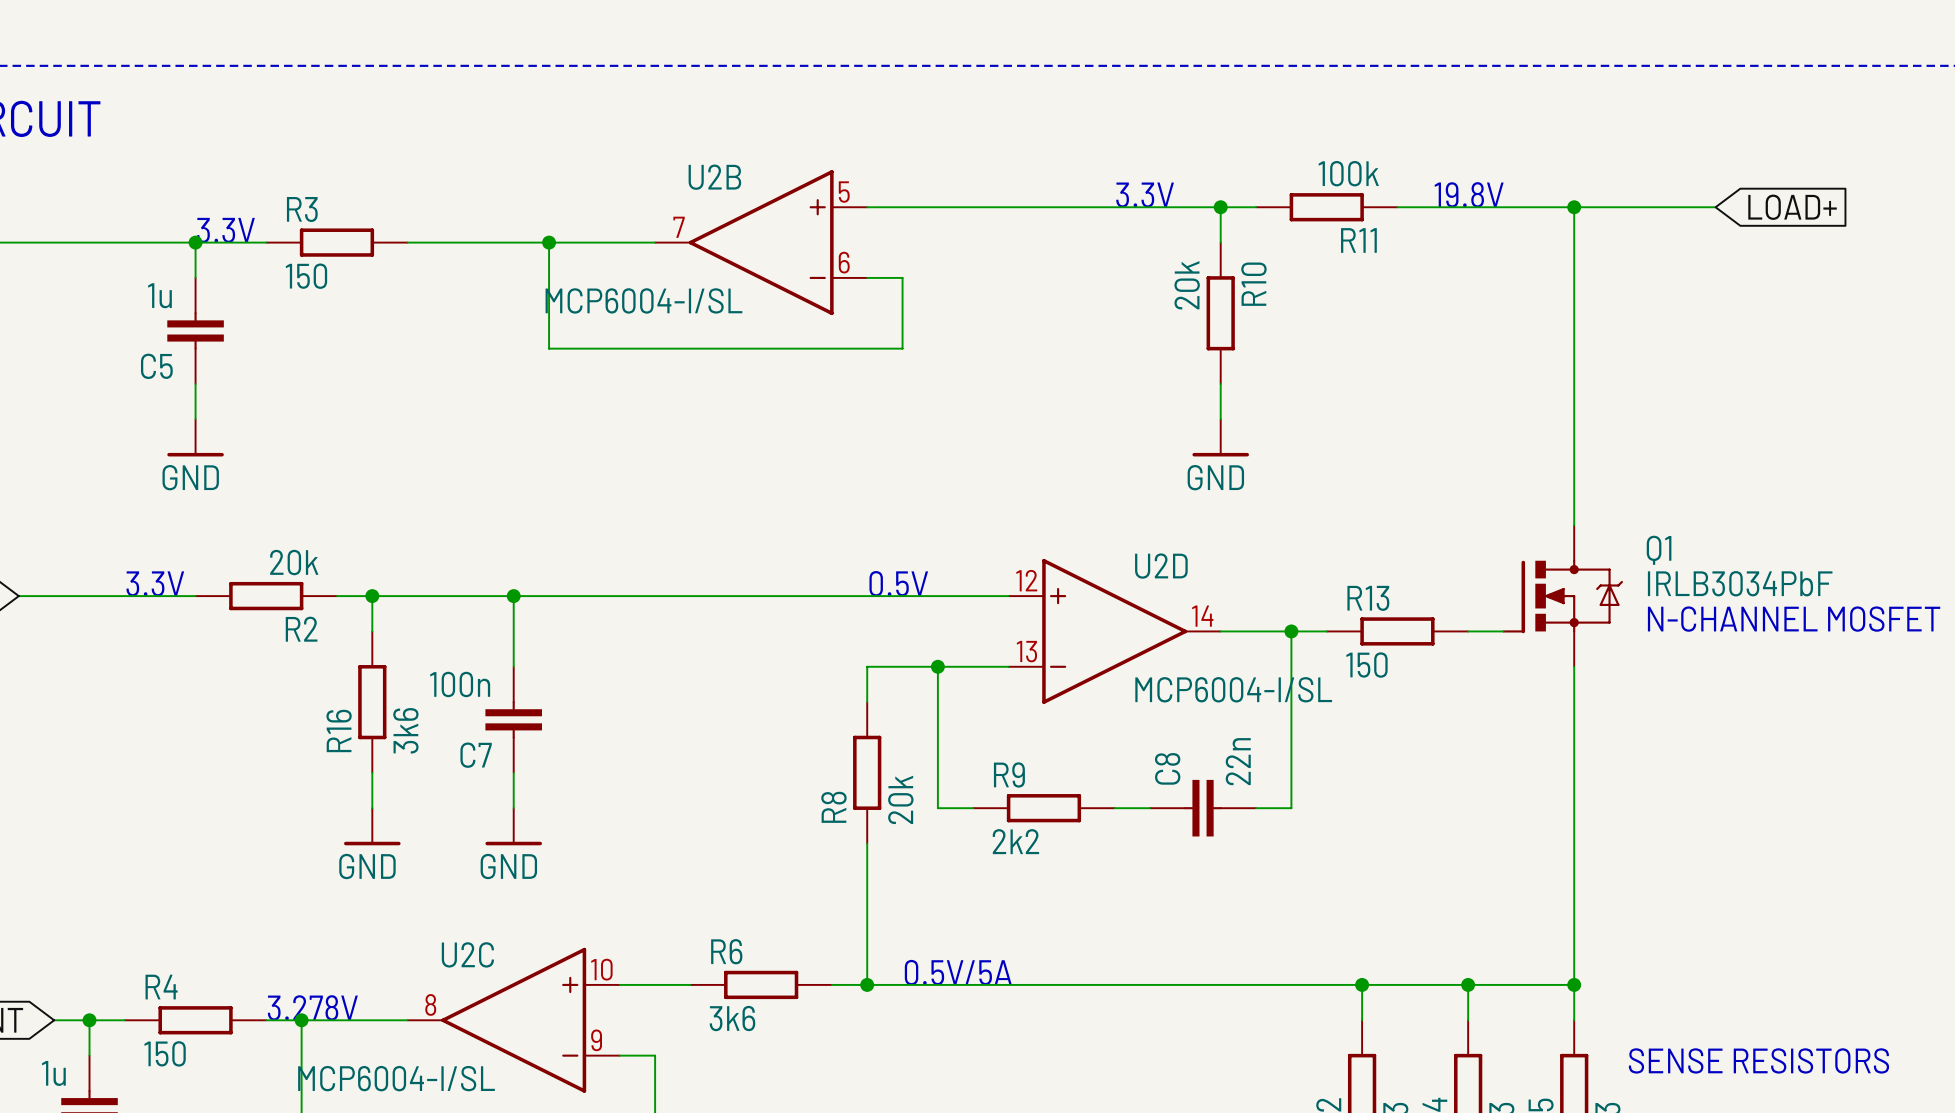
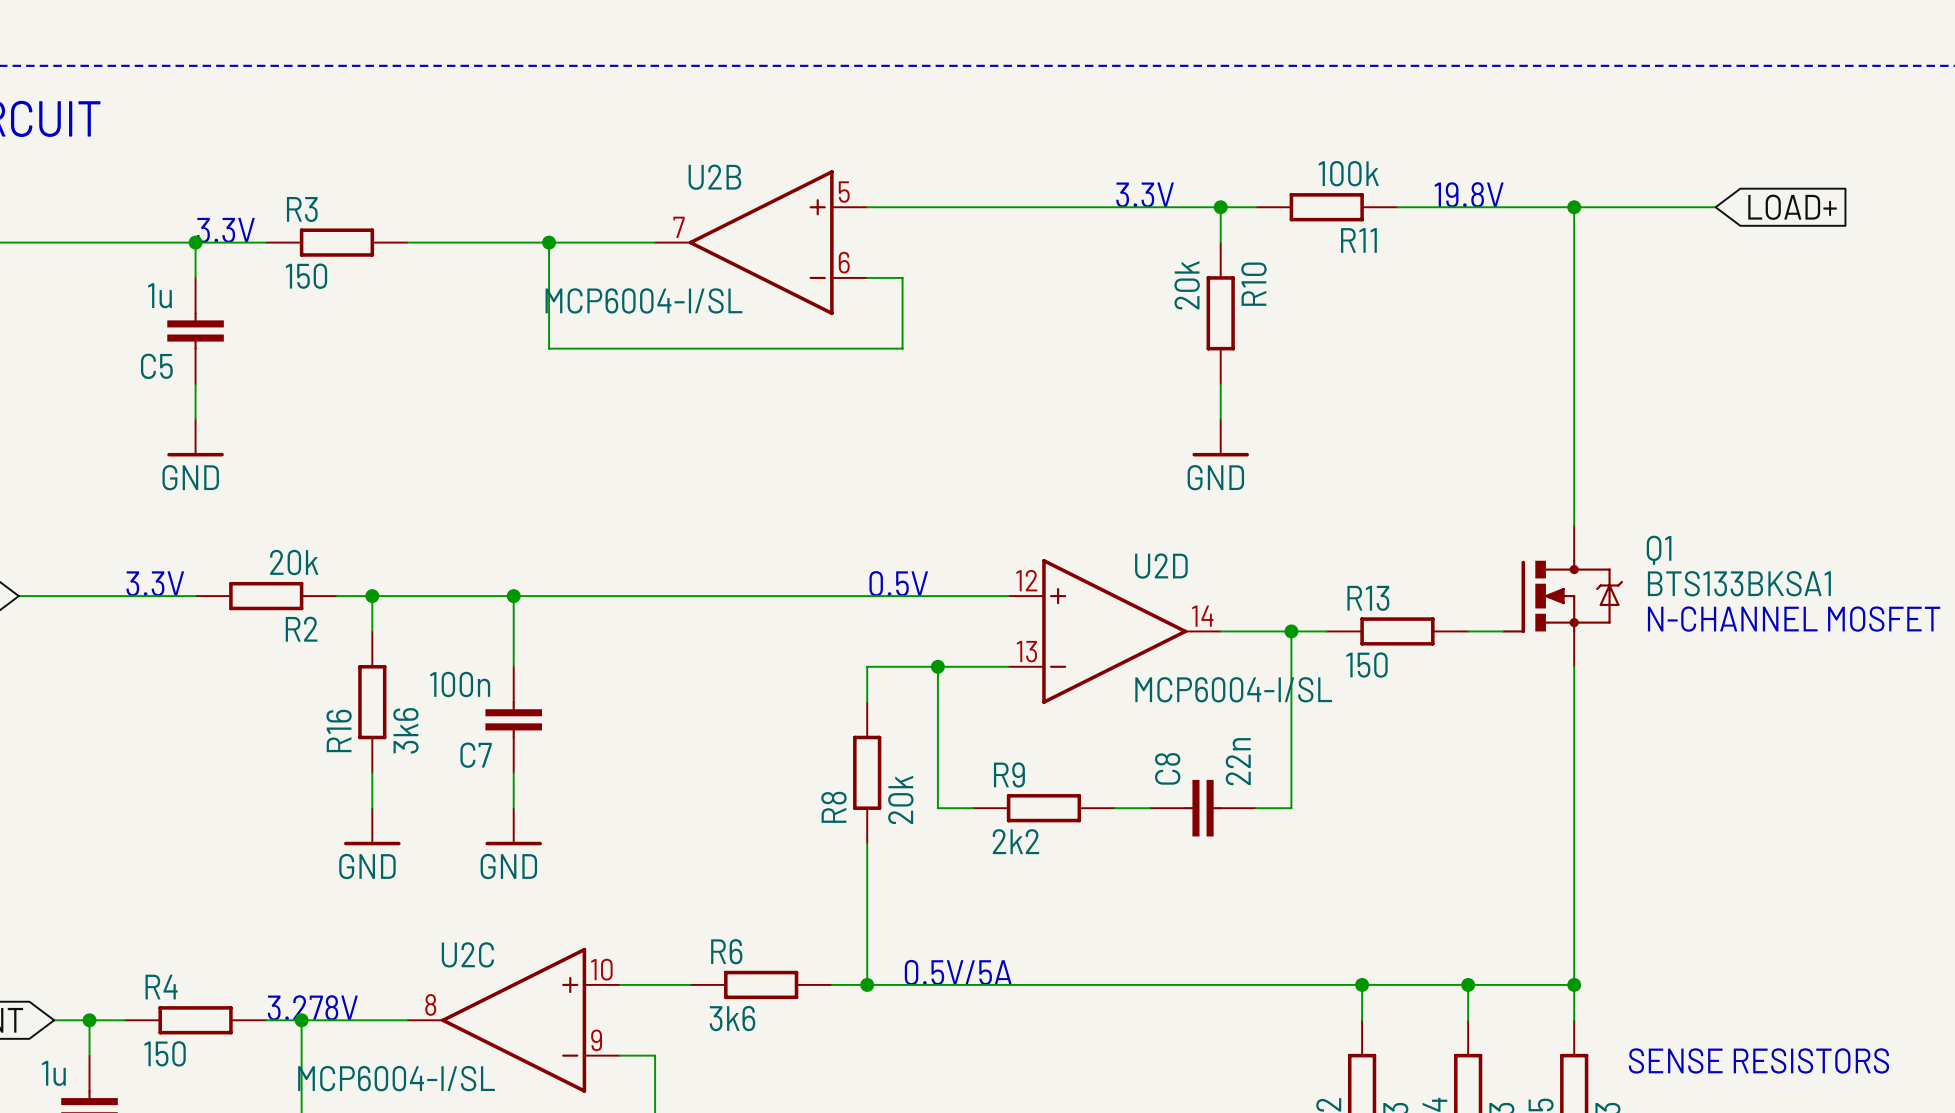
Q1 value: IRLB3034PbF (1740, 583) -> BTS133BKSA1 (1739, 583)

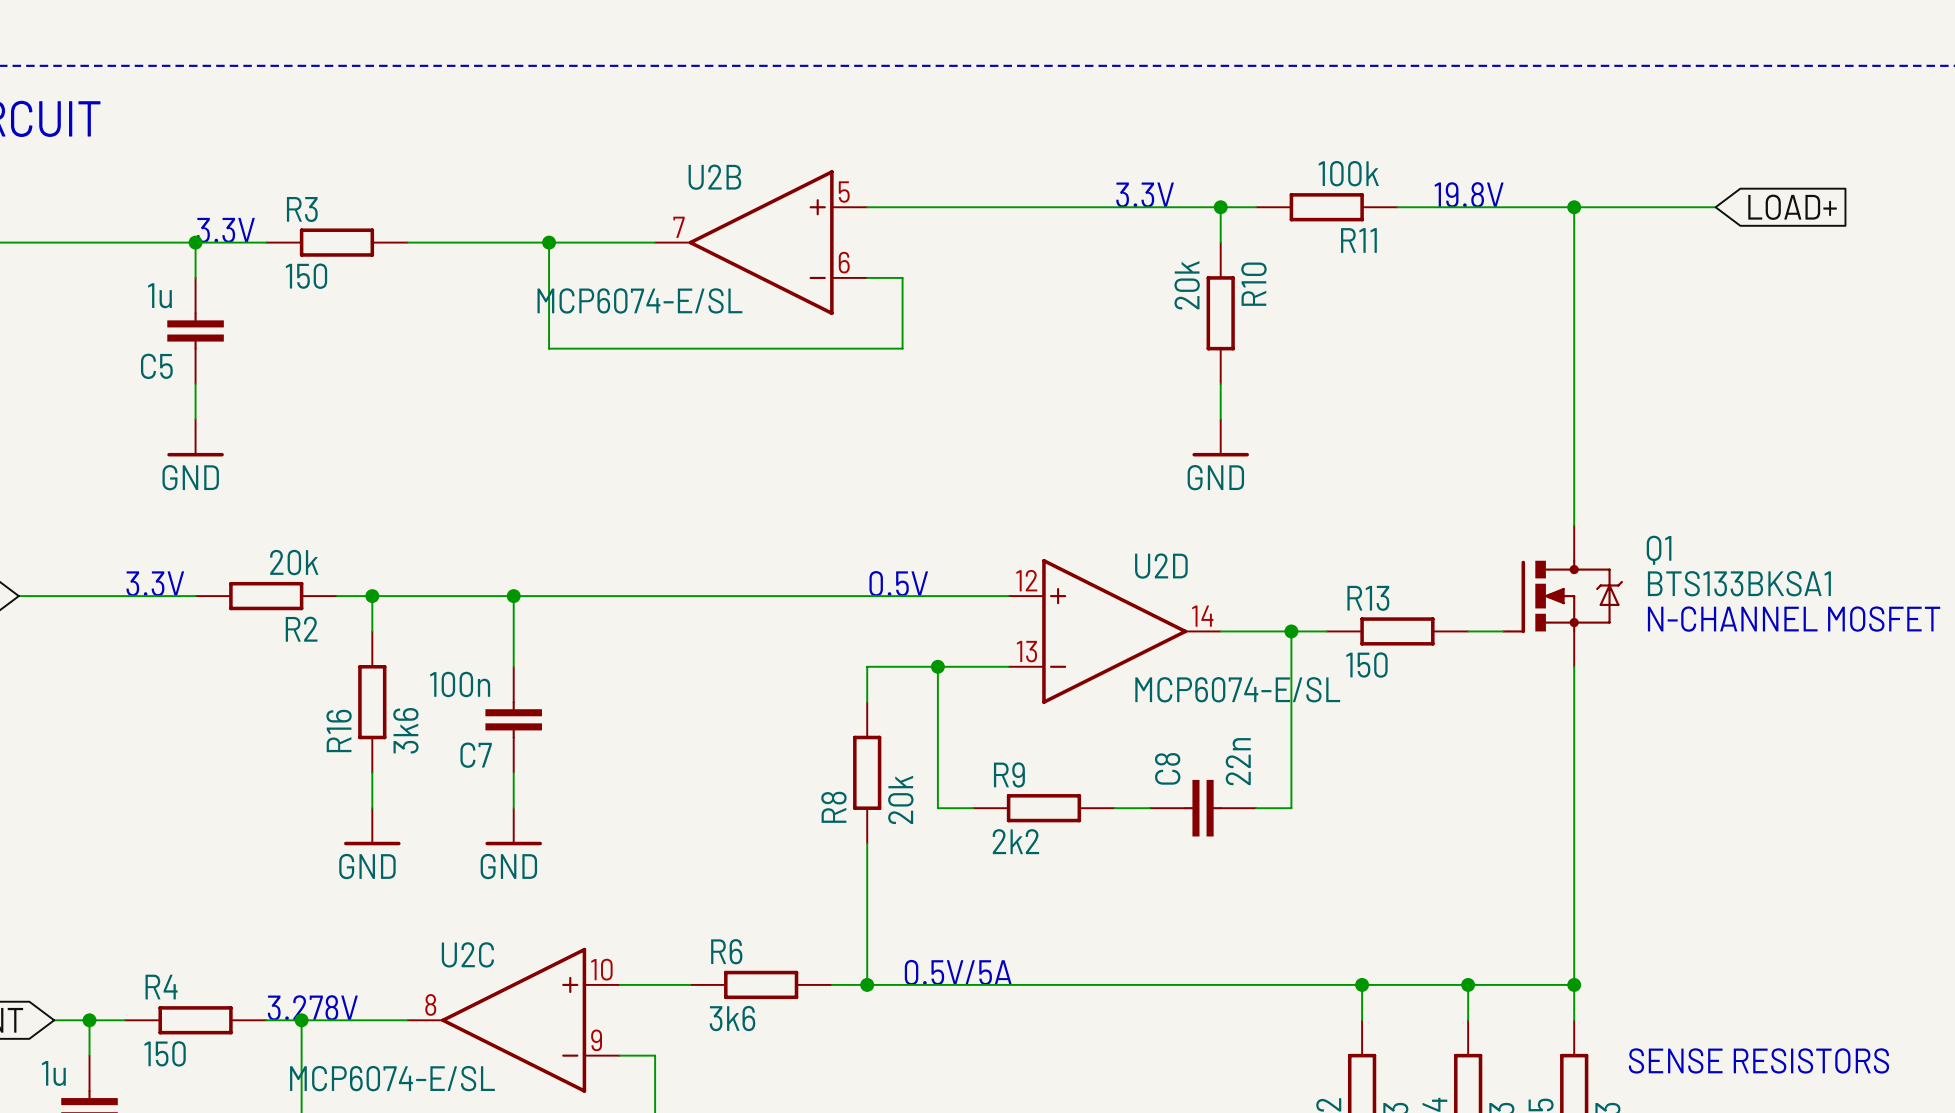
U2B value: MCP6004-I/SL (643, 300) -> MCP6074-E/SL (639, 300)
U2D value: MCP6004-I/SL (1233, 689) -> MCP6074-E/SL (1237, 689)
U2C value: MCP6004-I/SL (396, 1078) -> MCP6074-E/SL (392, 1078)

